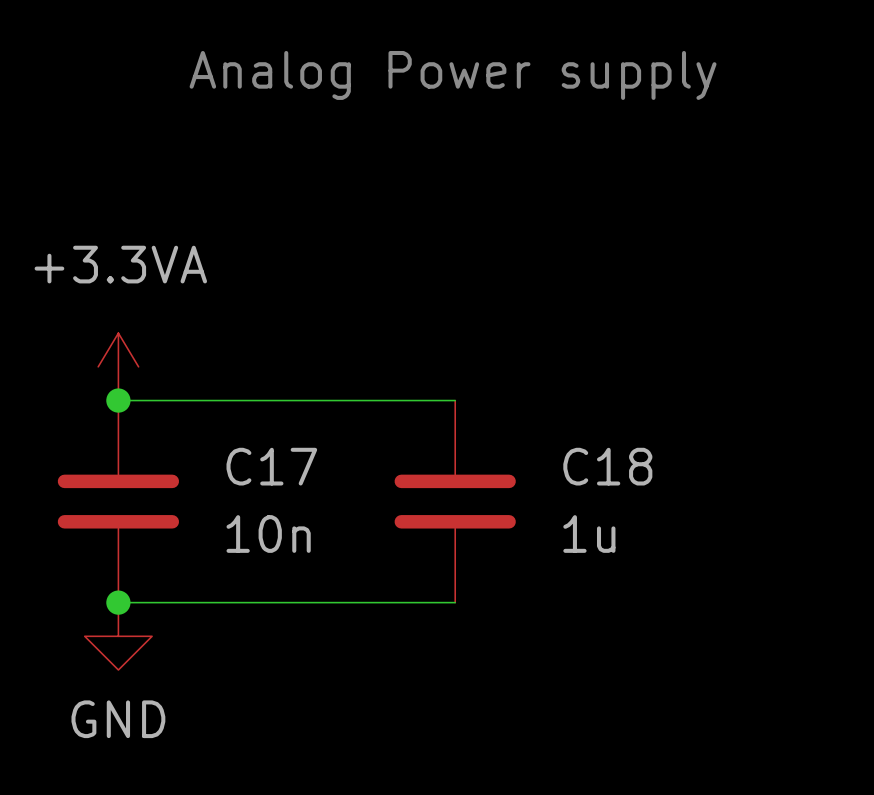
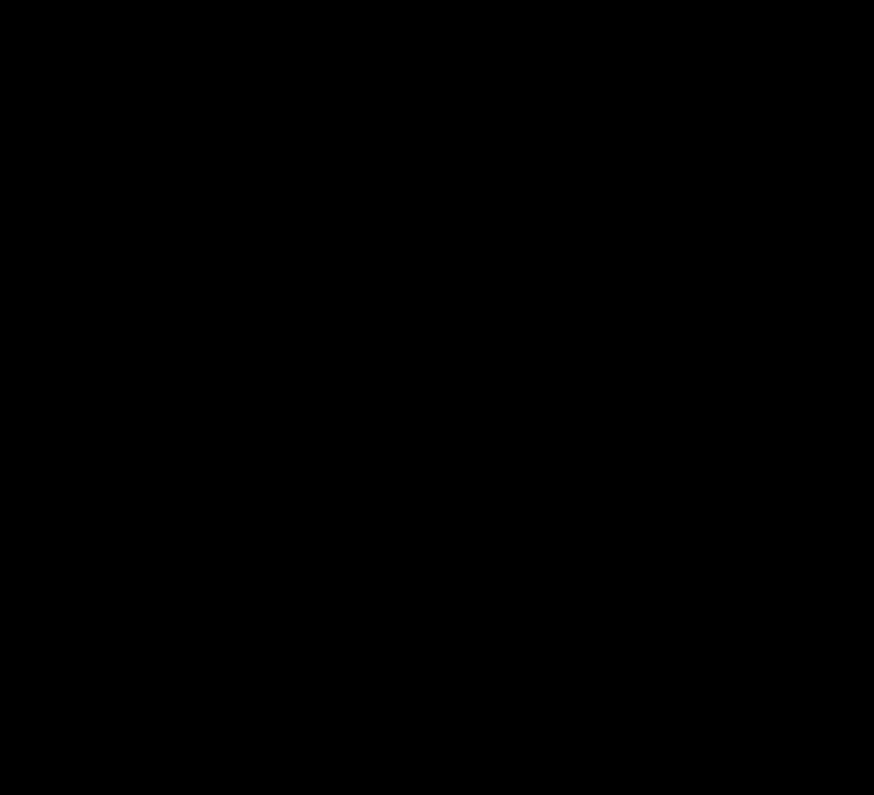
text: Analog Power supply (453, 75) -> none
power symbol: +3.3VA (118, 366) -> none
wire: (118, 400) (455, 400) -> none
junction: (118, 400) -> none
C17: 10n (118, 501) -> none
C18: 1u (455, 501) -> none
wire: (118, 602) (455, 602) -> none
junction: (118, 602) -> none
power symbol: GND (118, 636) -> none

